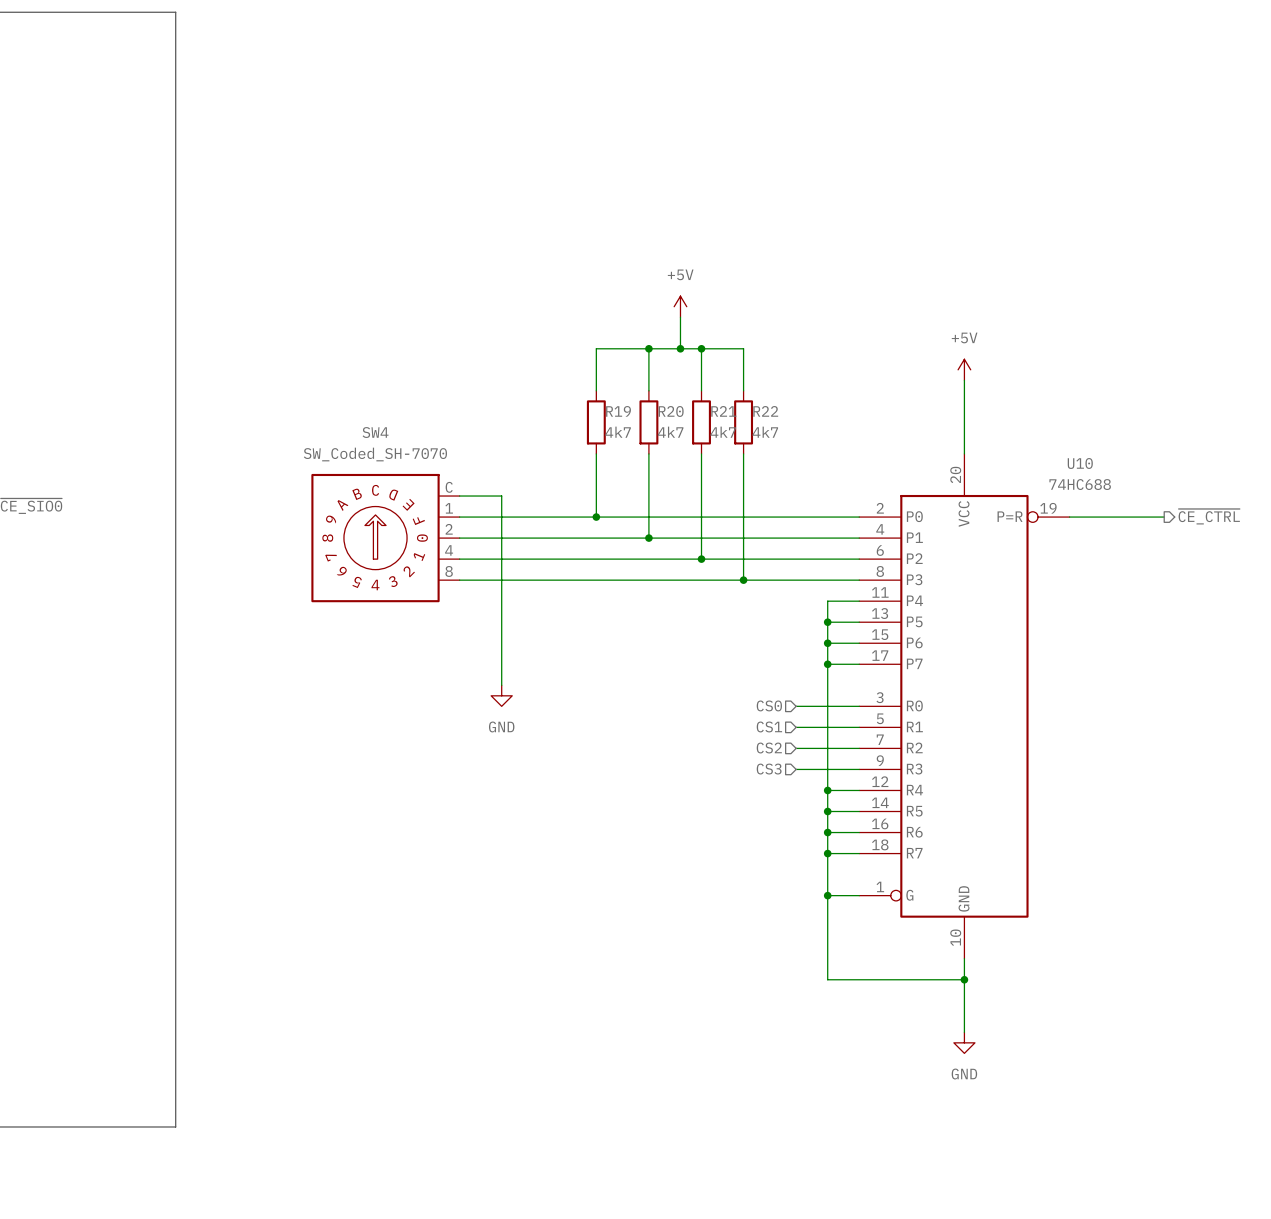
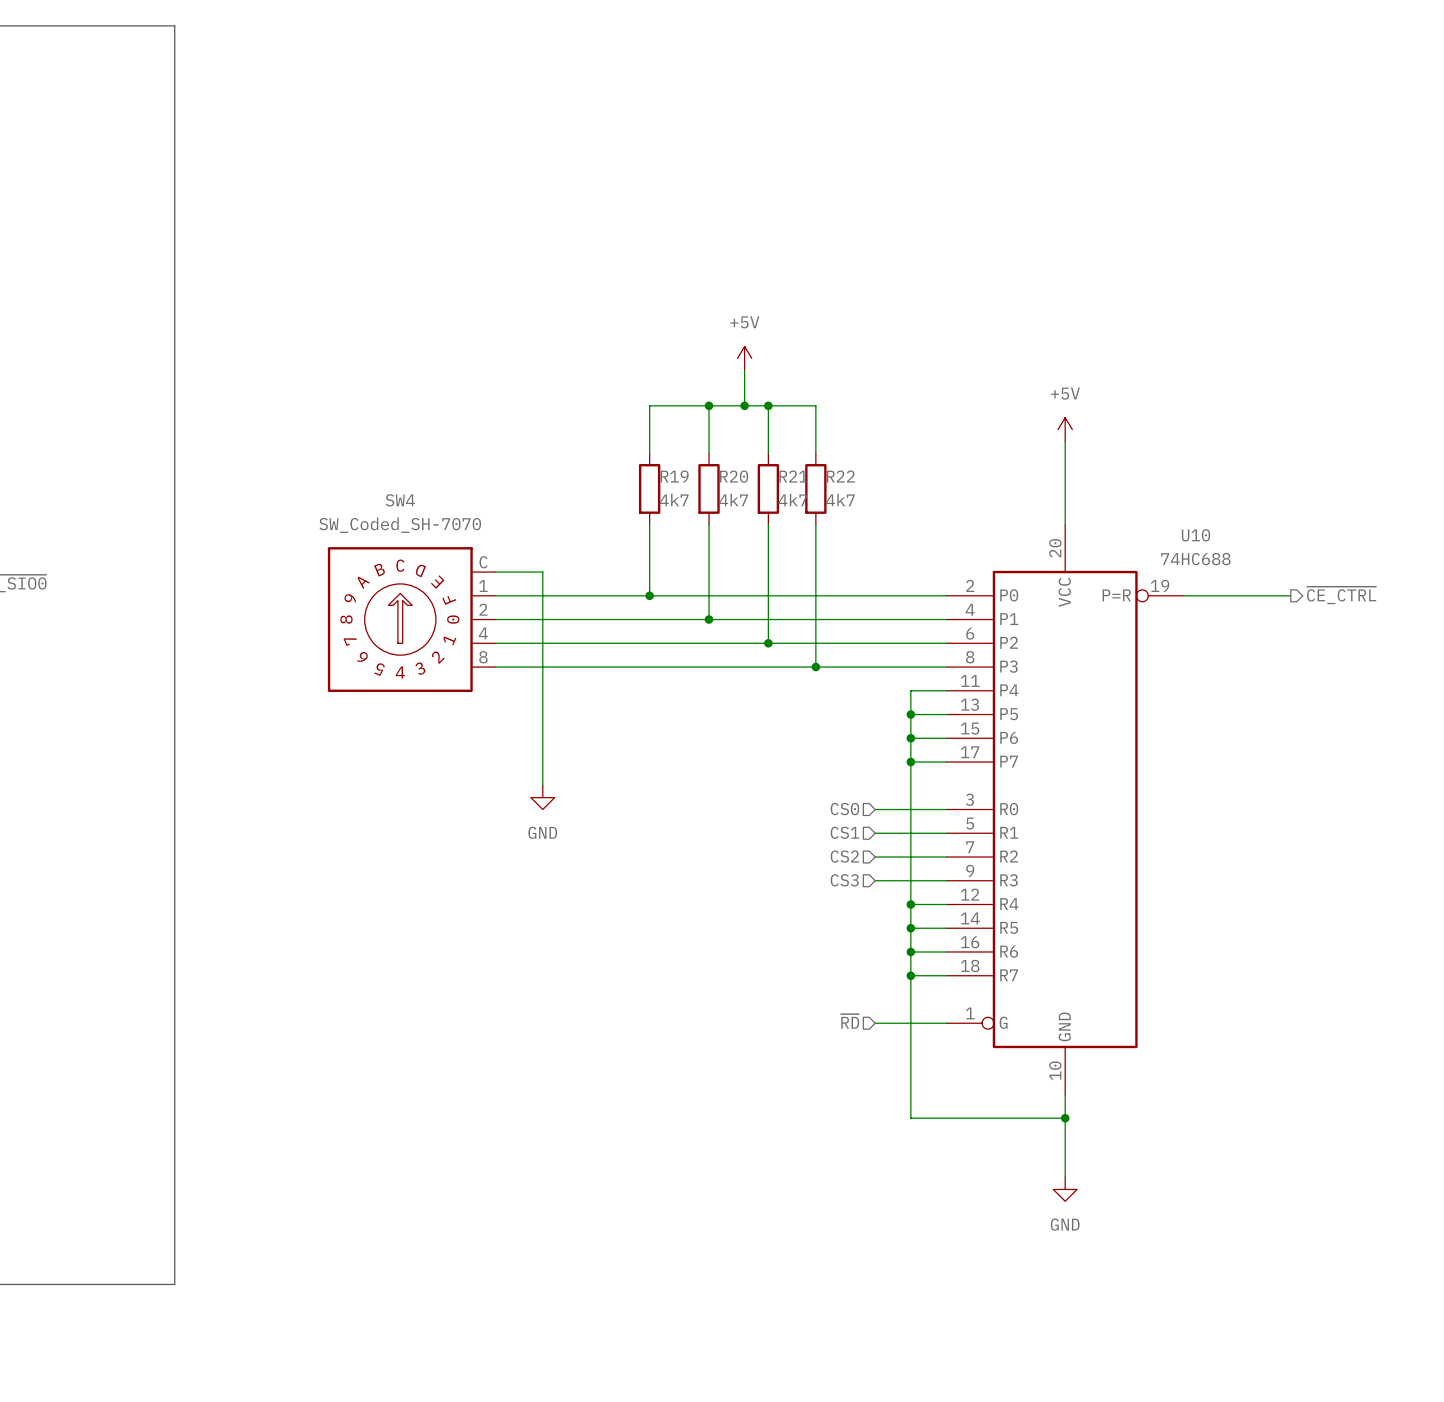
hierarchical label: none -> ~{RD} (850, 1021)
wire: none -> (875, 1023) (910, 1023)
junction: (827, 895) -> none

